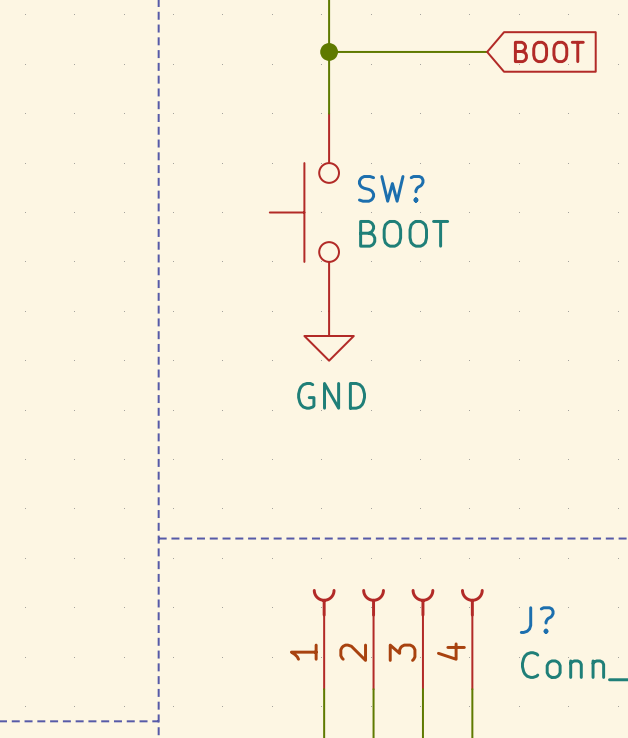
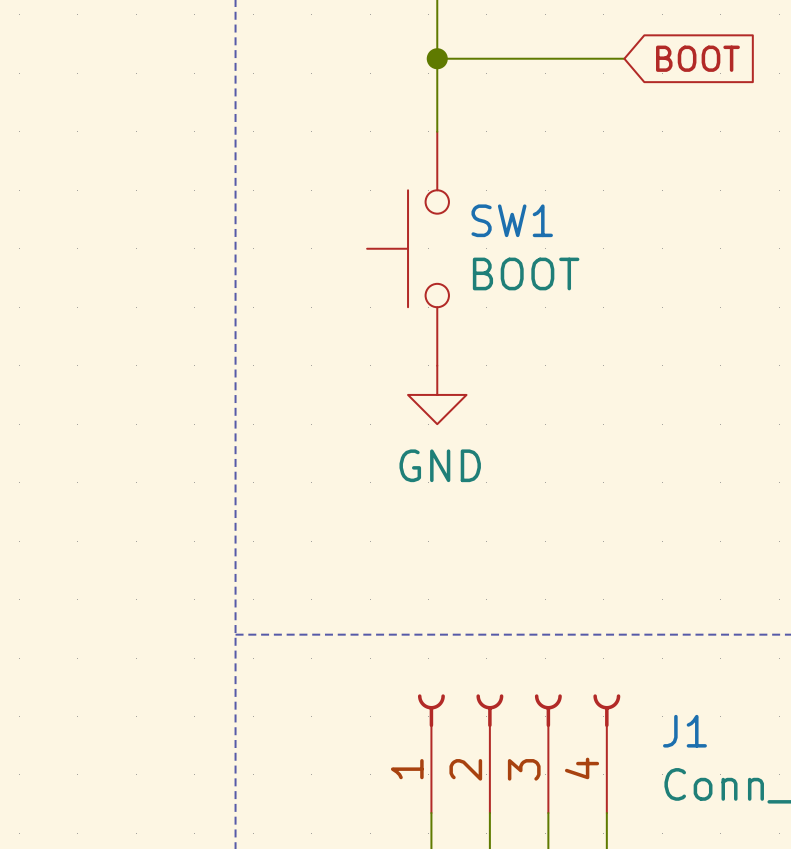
SW? name: SW? (391, 188) -> SW1 (512, 220)
J? name: J? (537, 620) -> J1 (684, 731)

